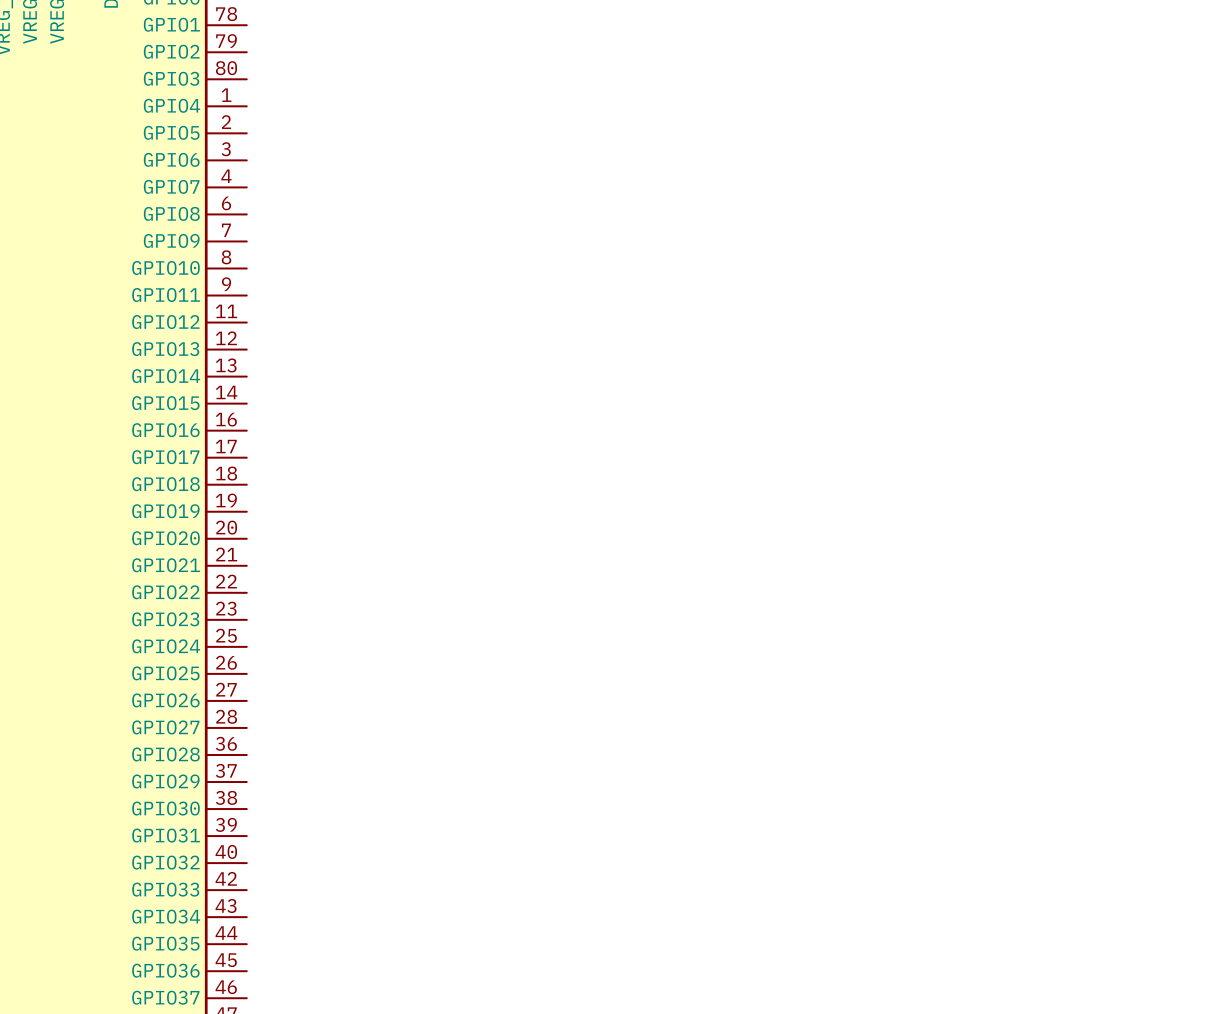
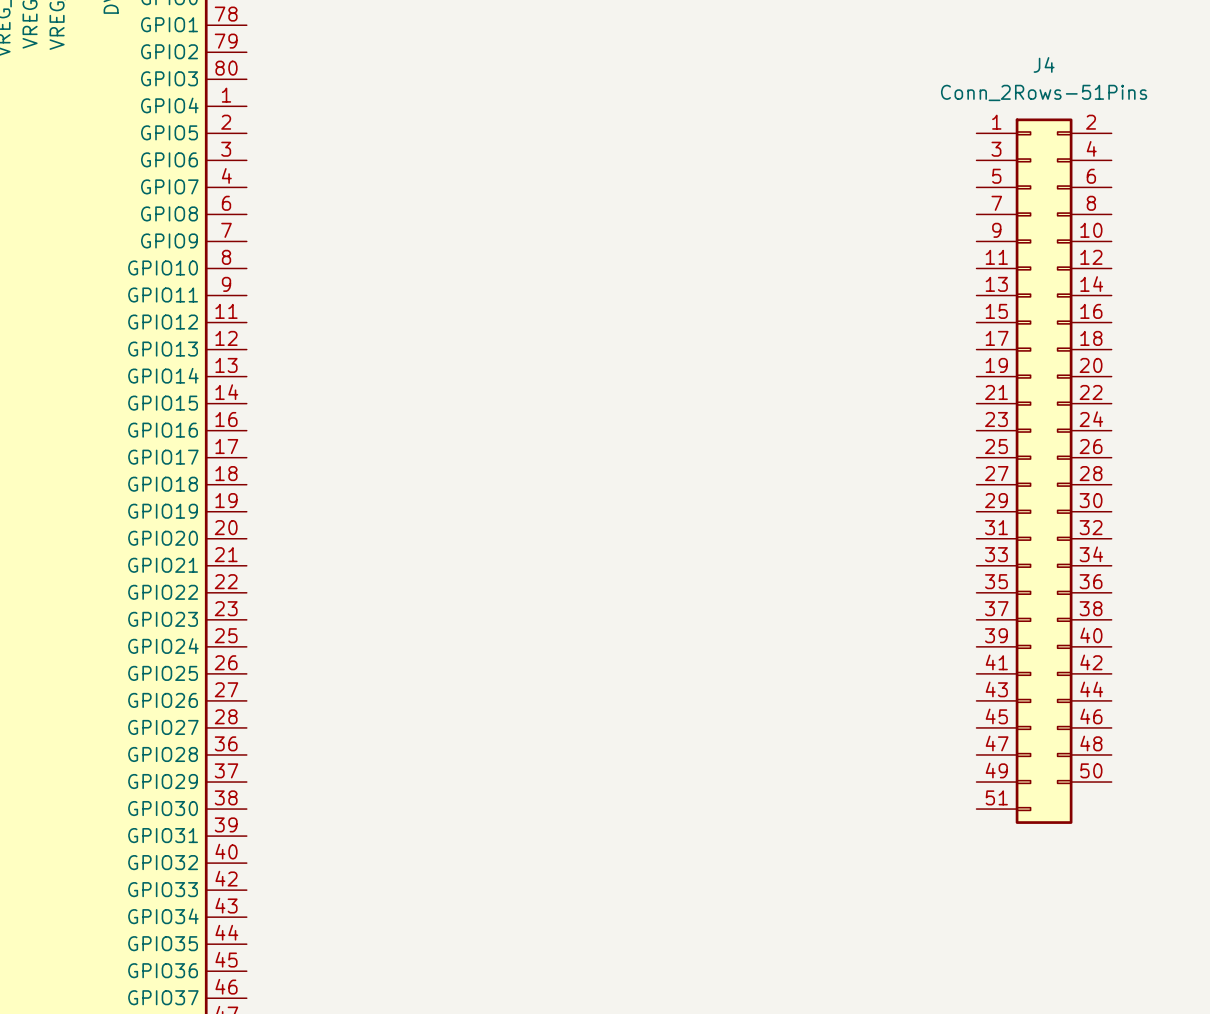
J4: none -> Conn_2Rows-51Pins (1044, 471)

